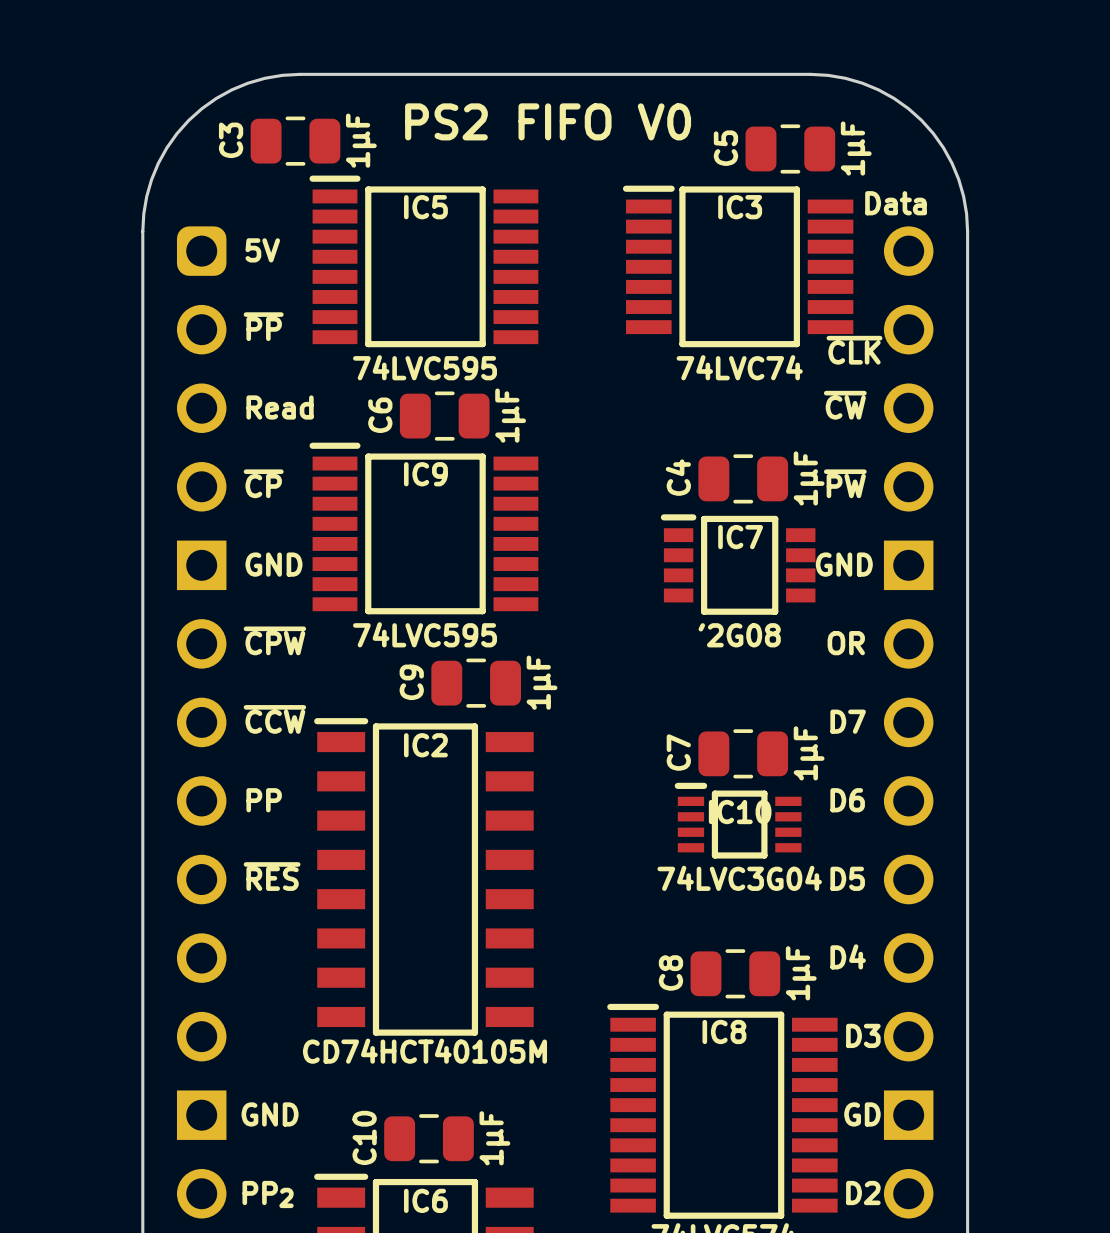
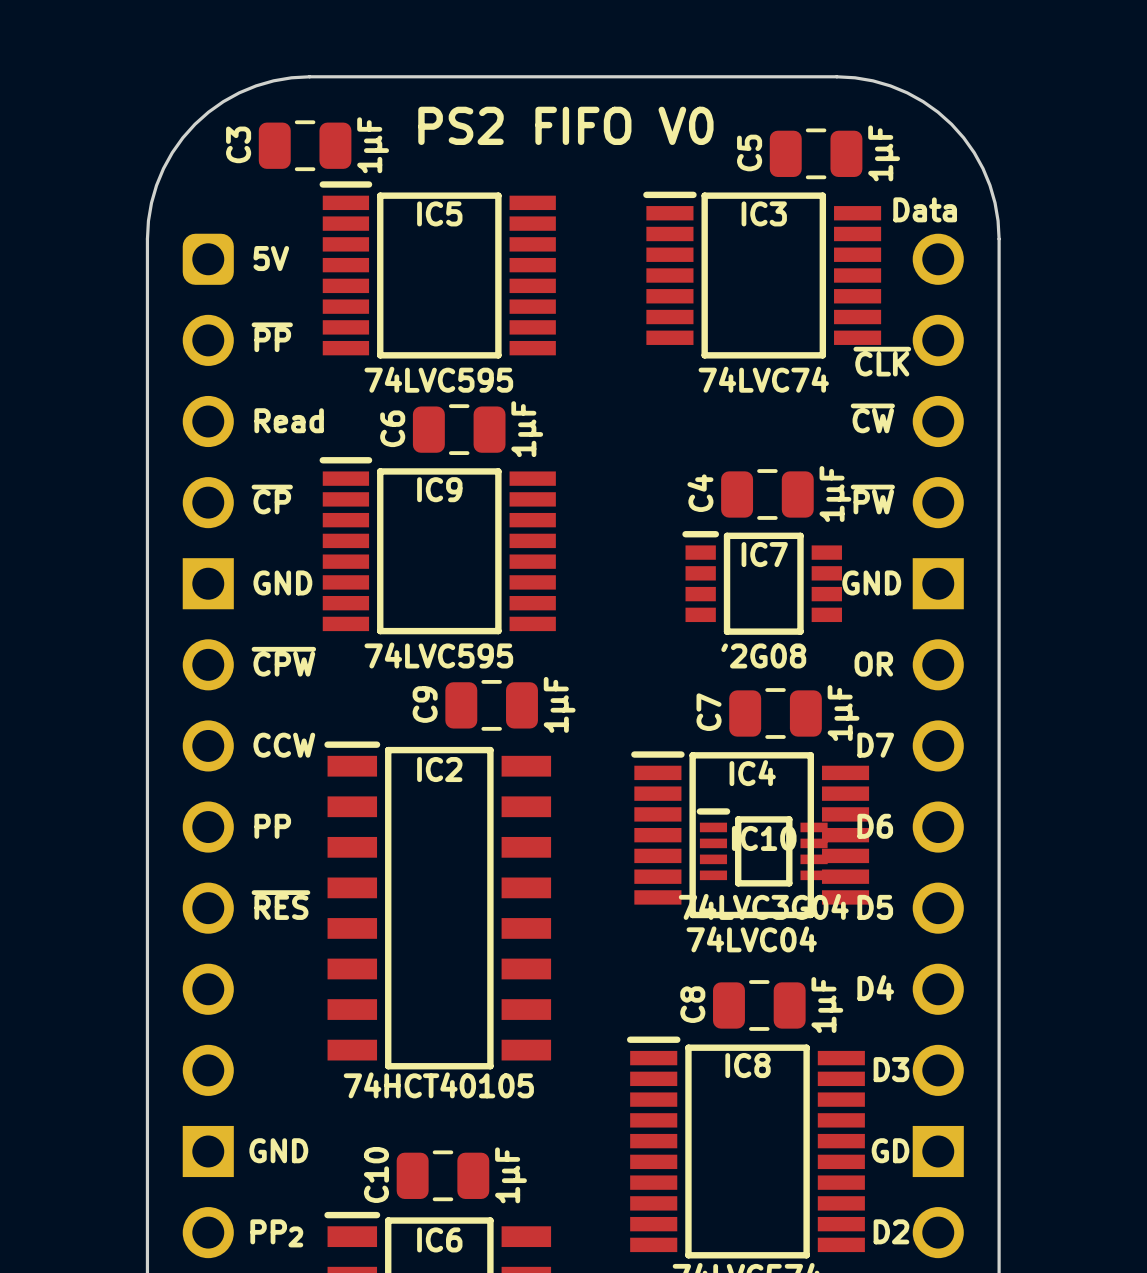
text: ~{CCW} (274, 719) -> CCW (284, 745)
C7 position: (743, 753) -> (775, 713)
IC4: none -> (750, 834)
IC2 text: none -> 74HCT40105 (438, 1085)
IC2 value: CD74HCT40105M (424, 1051) -> none

